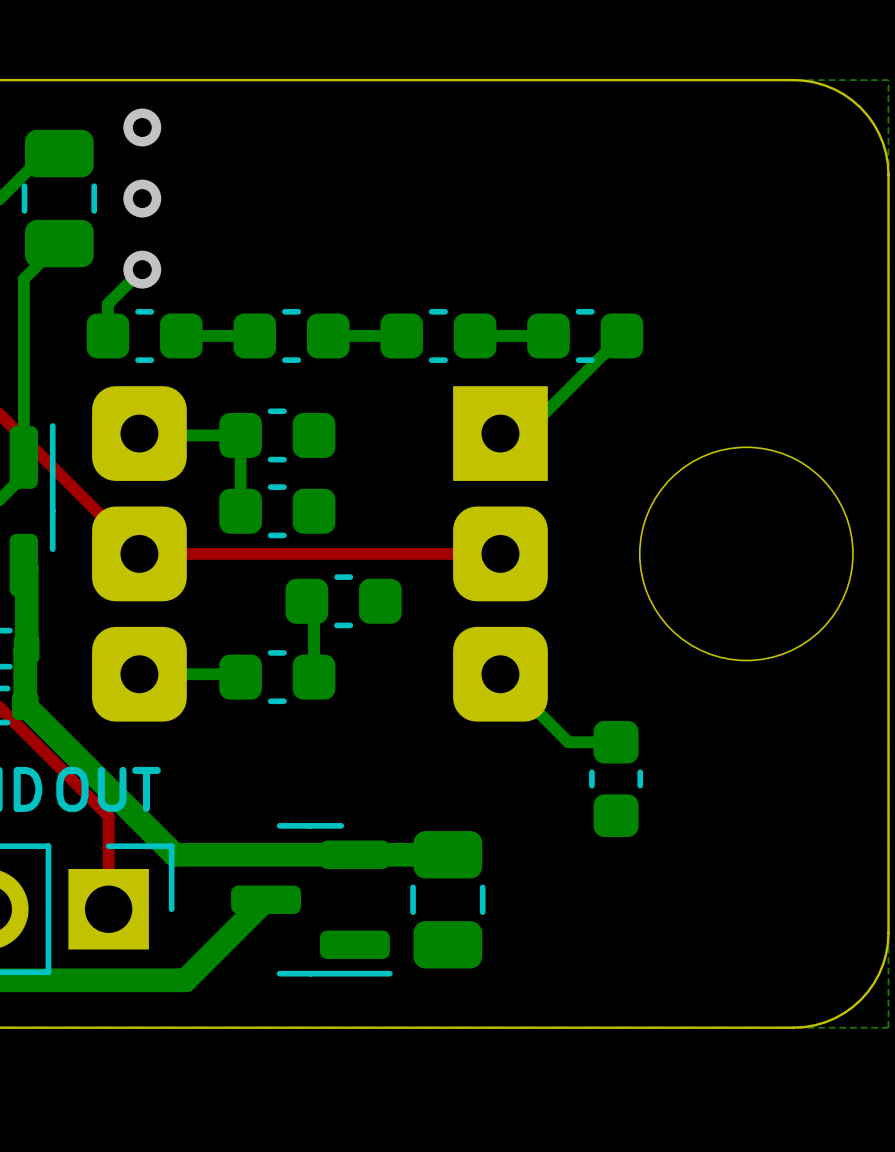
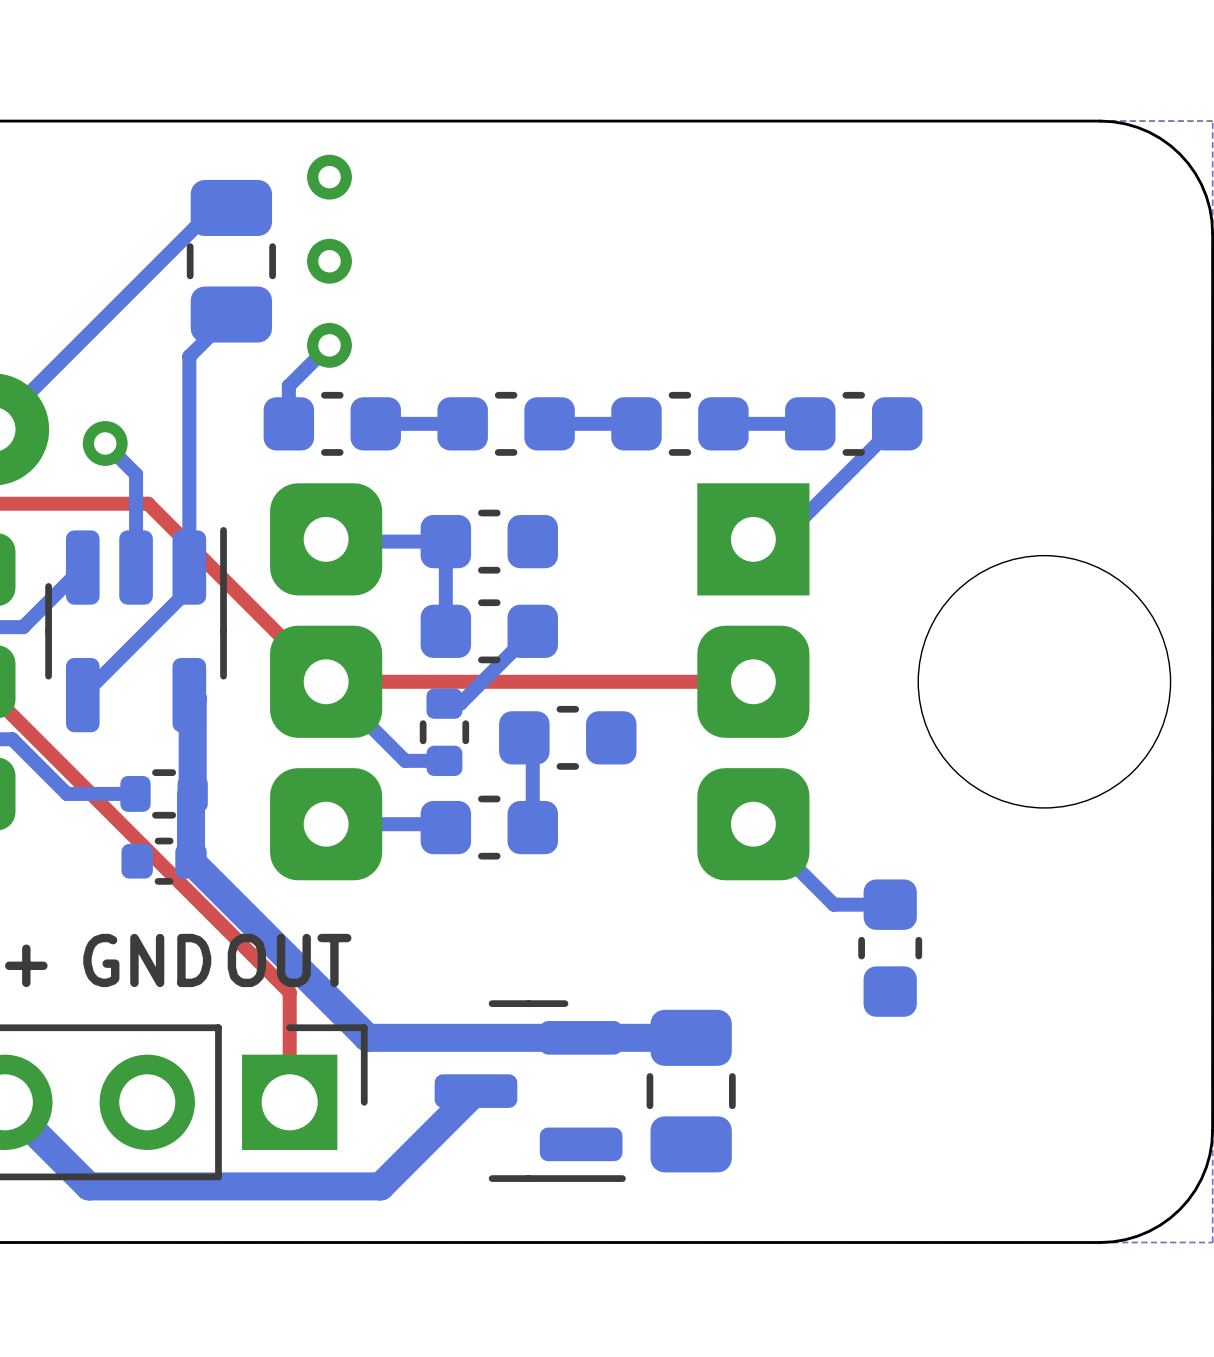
bottom track: none -> (532, 631) (460, 703) (444, 703)
bottom track: none -> (326, 681) (405, 760) (444, 760)
part: none -> (444, 732)

